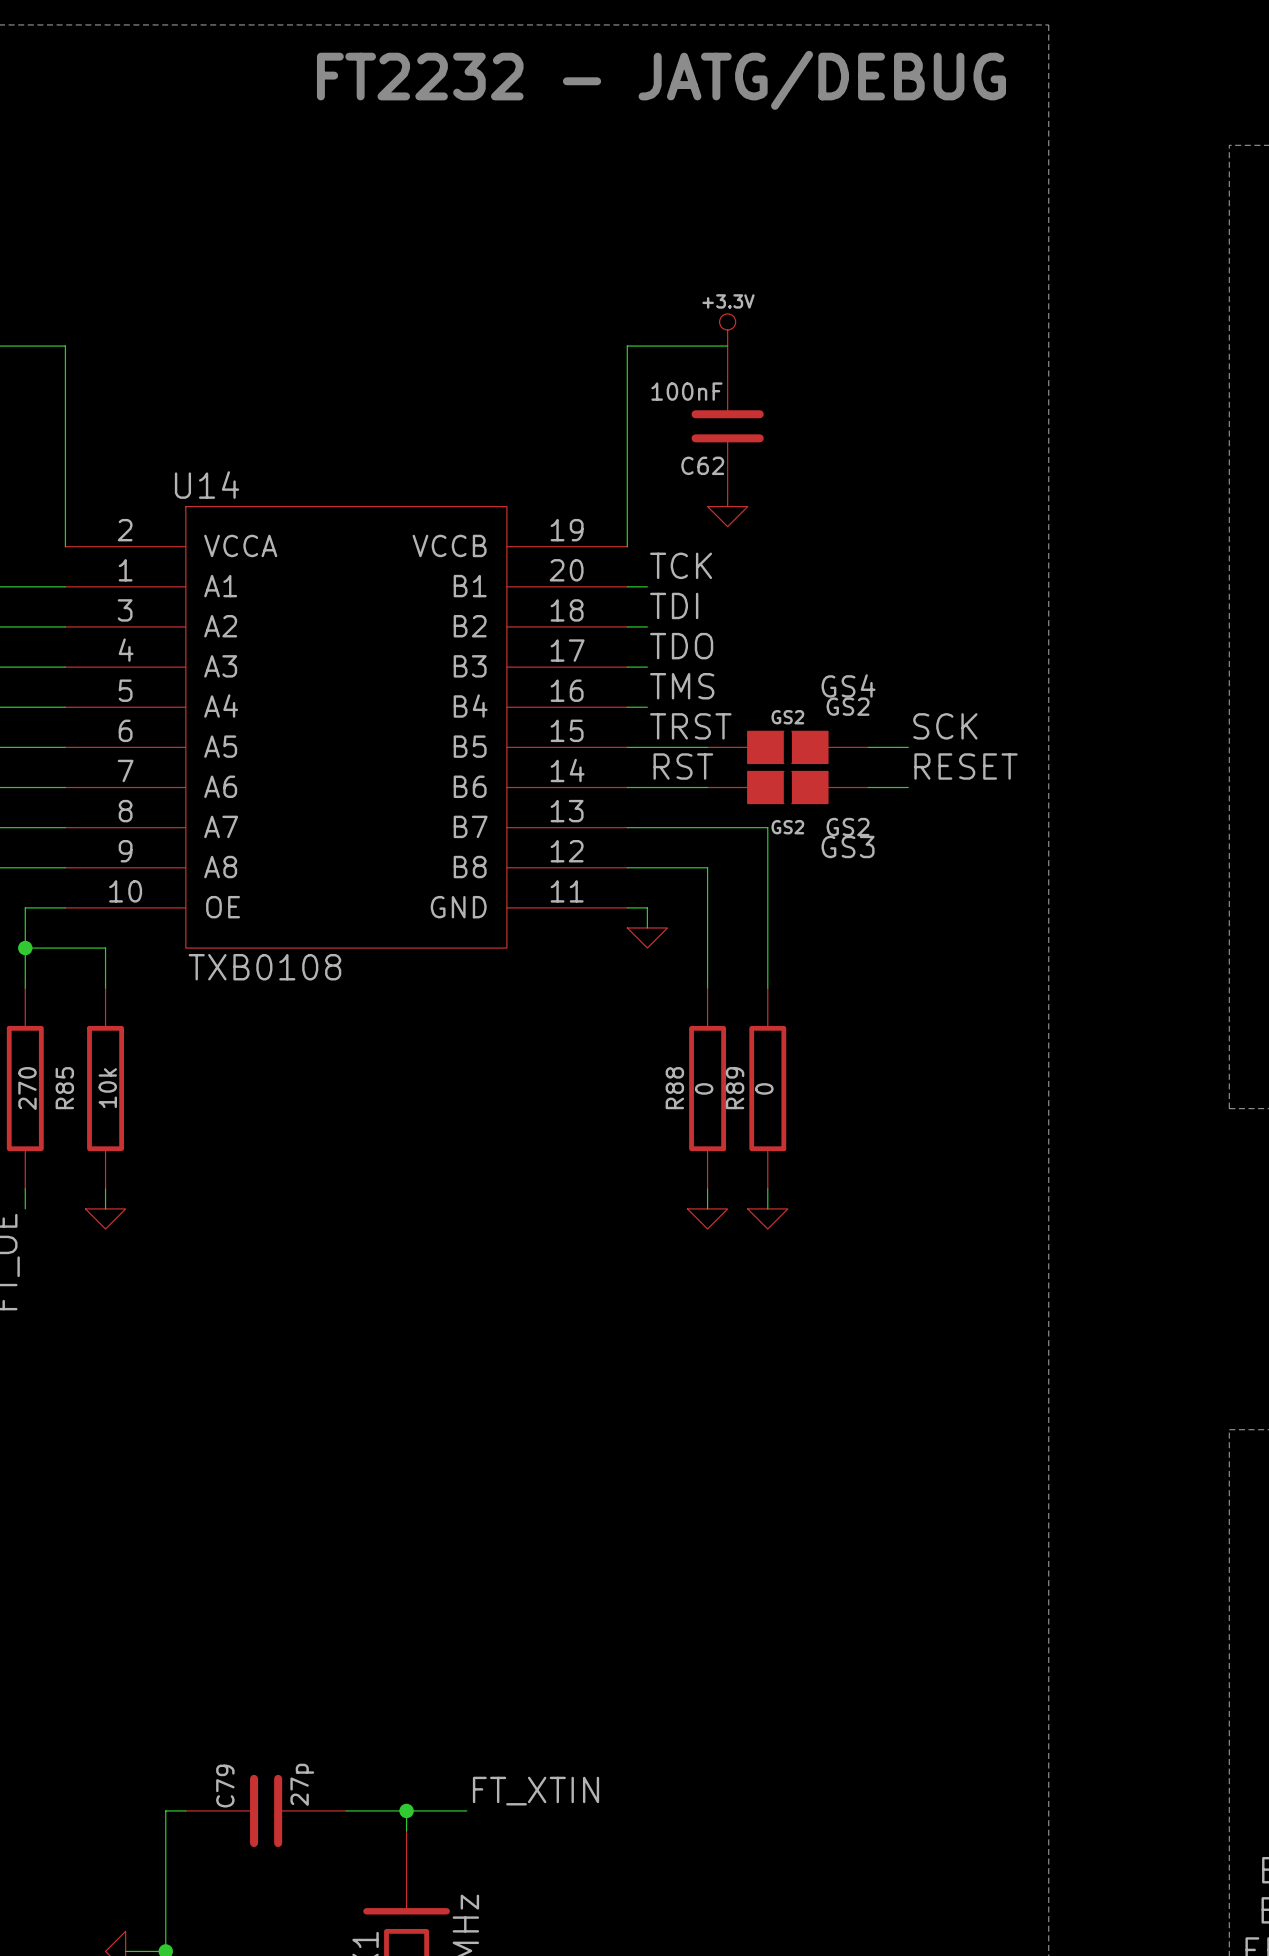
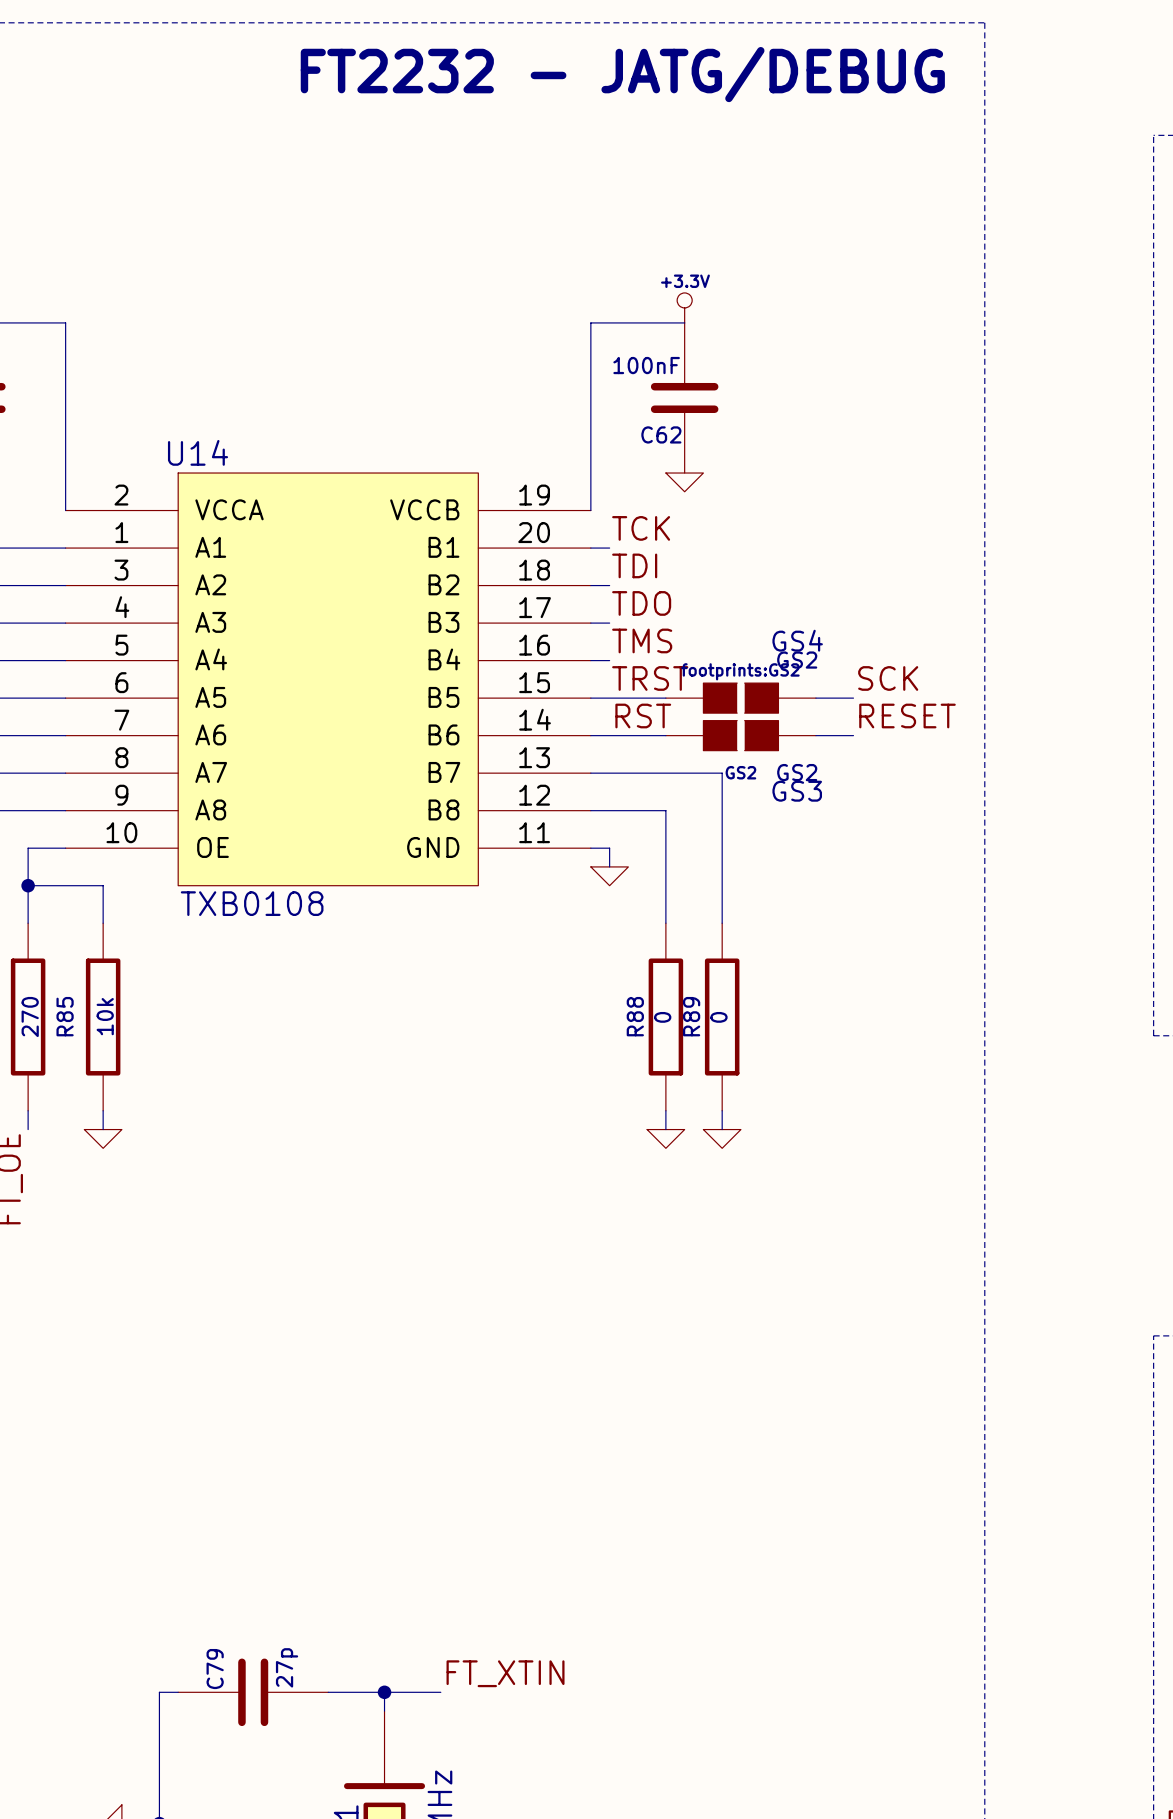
GS4 text: GS2 (787, 717) -> footprints:GS2 (740, 671)

